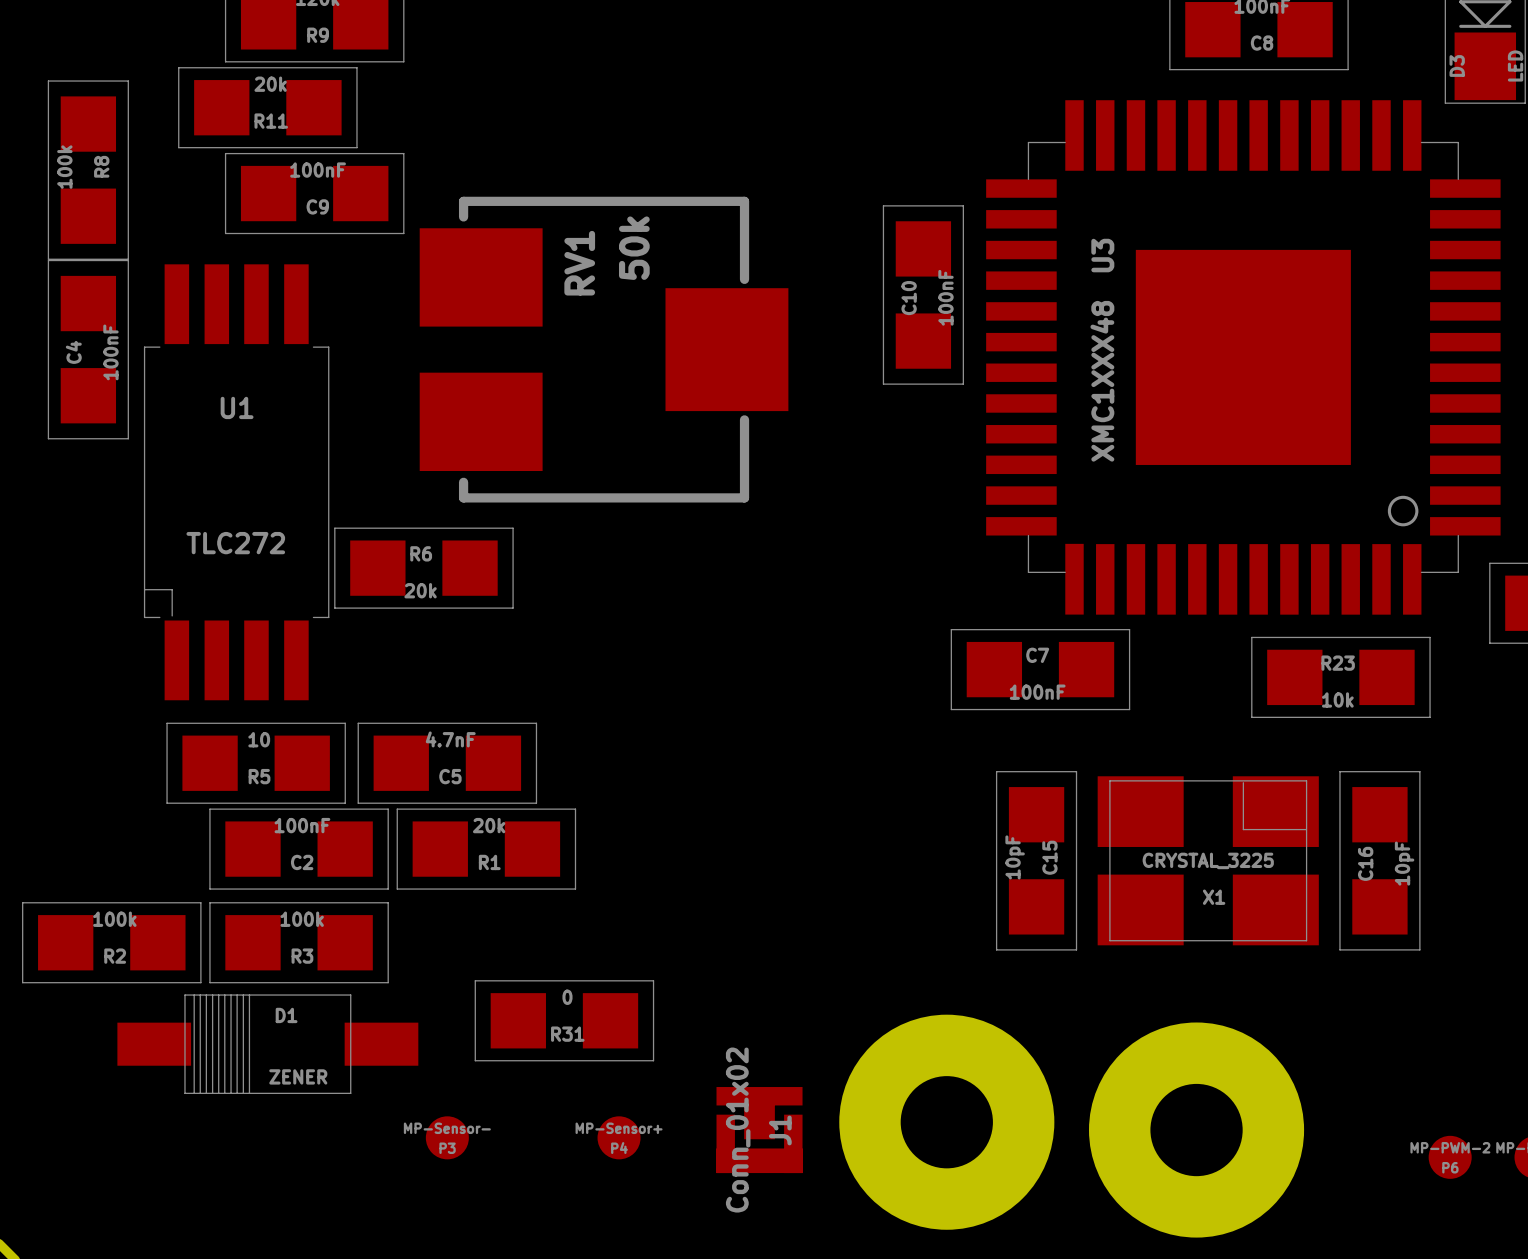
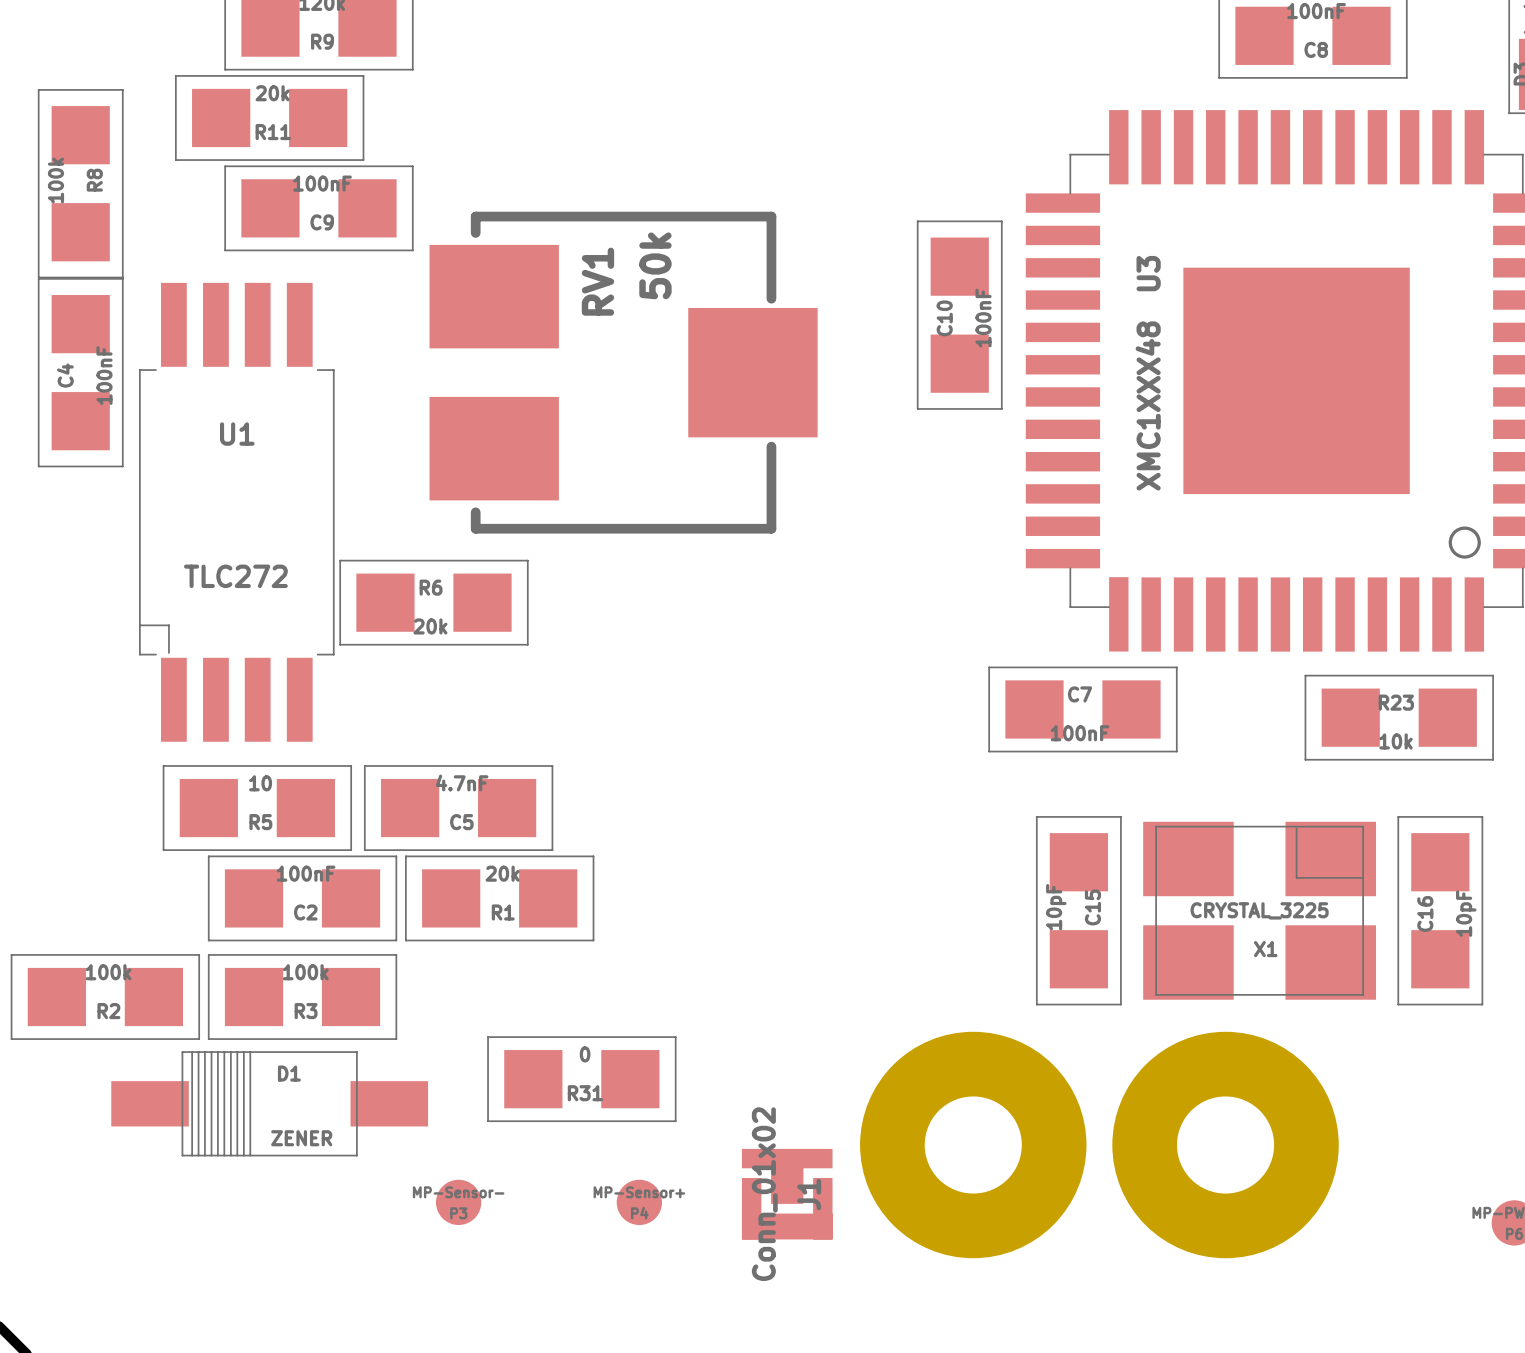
part position: (946, 1122) -> (973, 1145)
part position: (1196, 1130) -> (1225, 1145)

